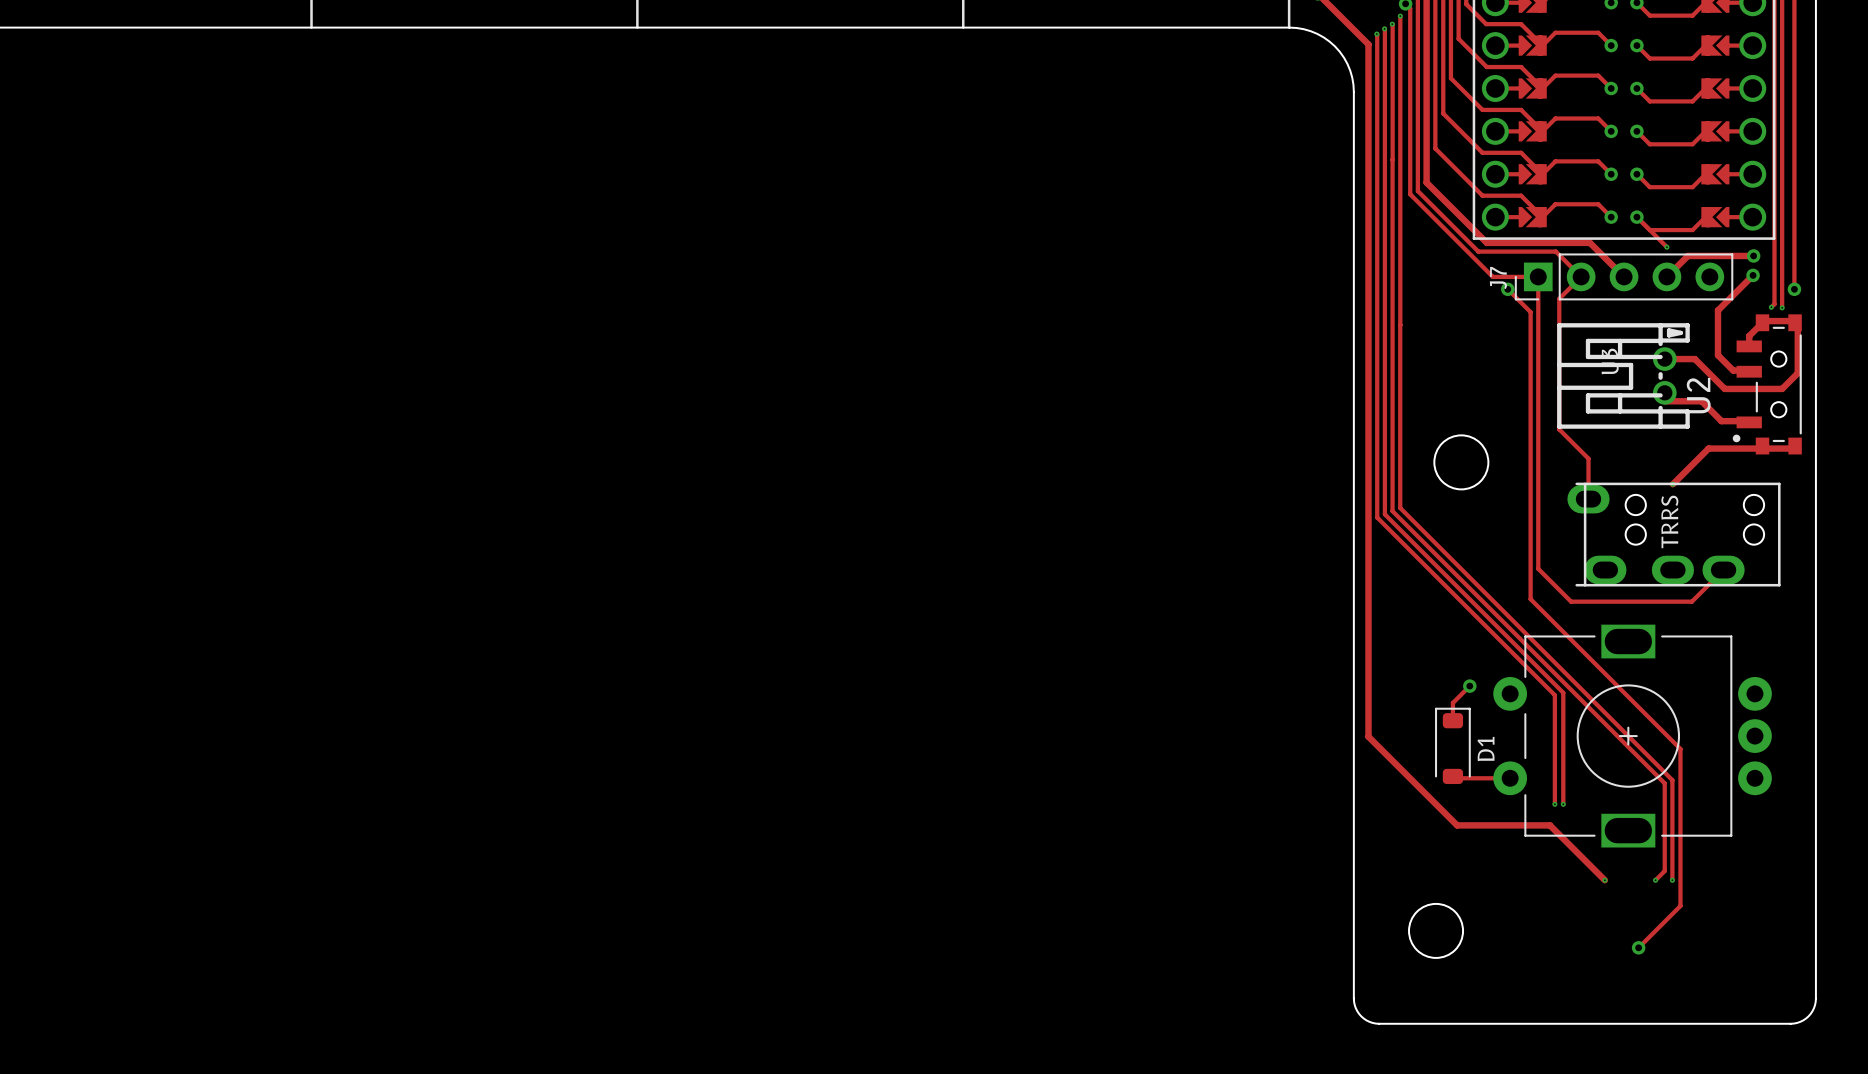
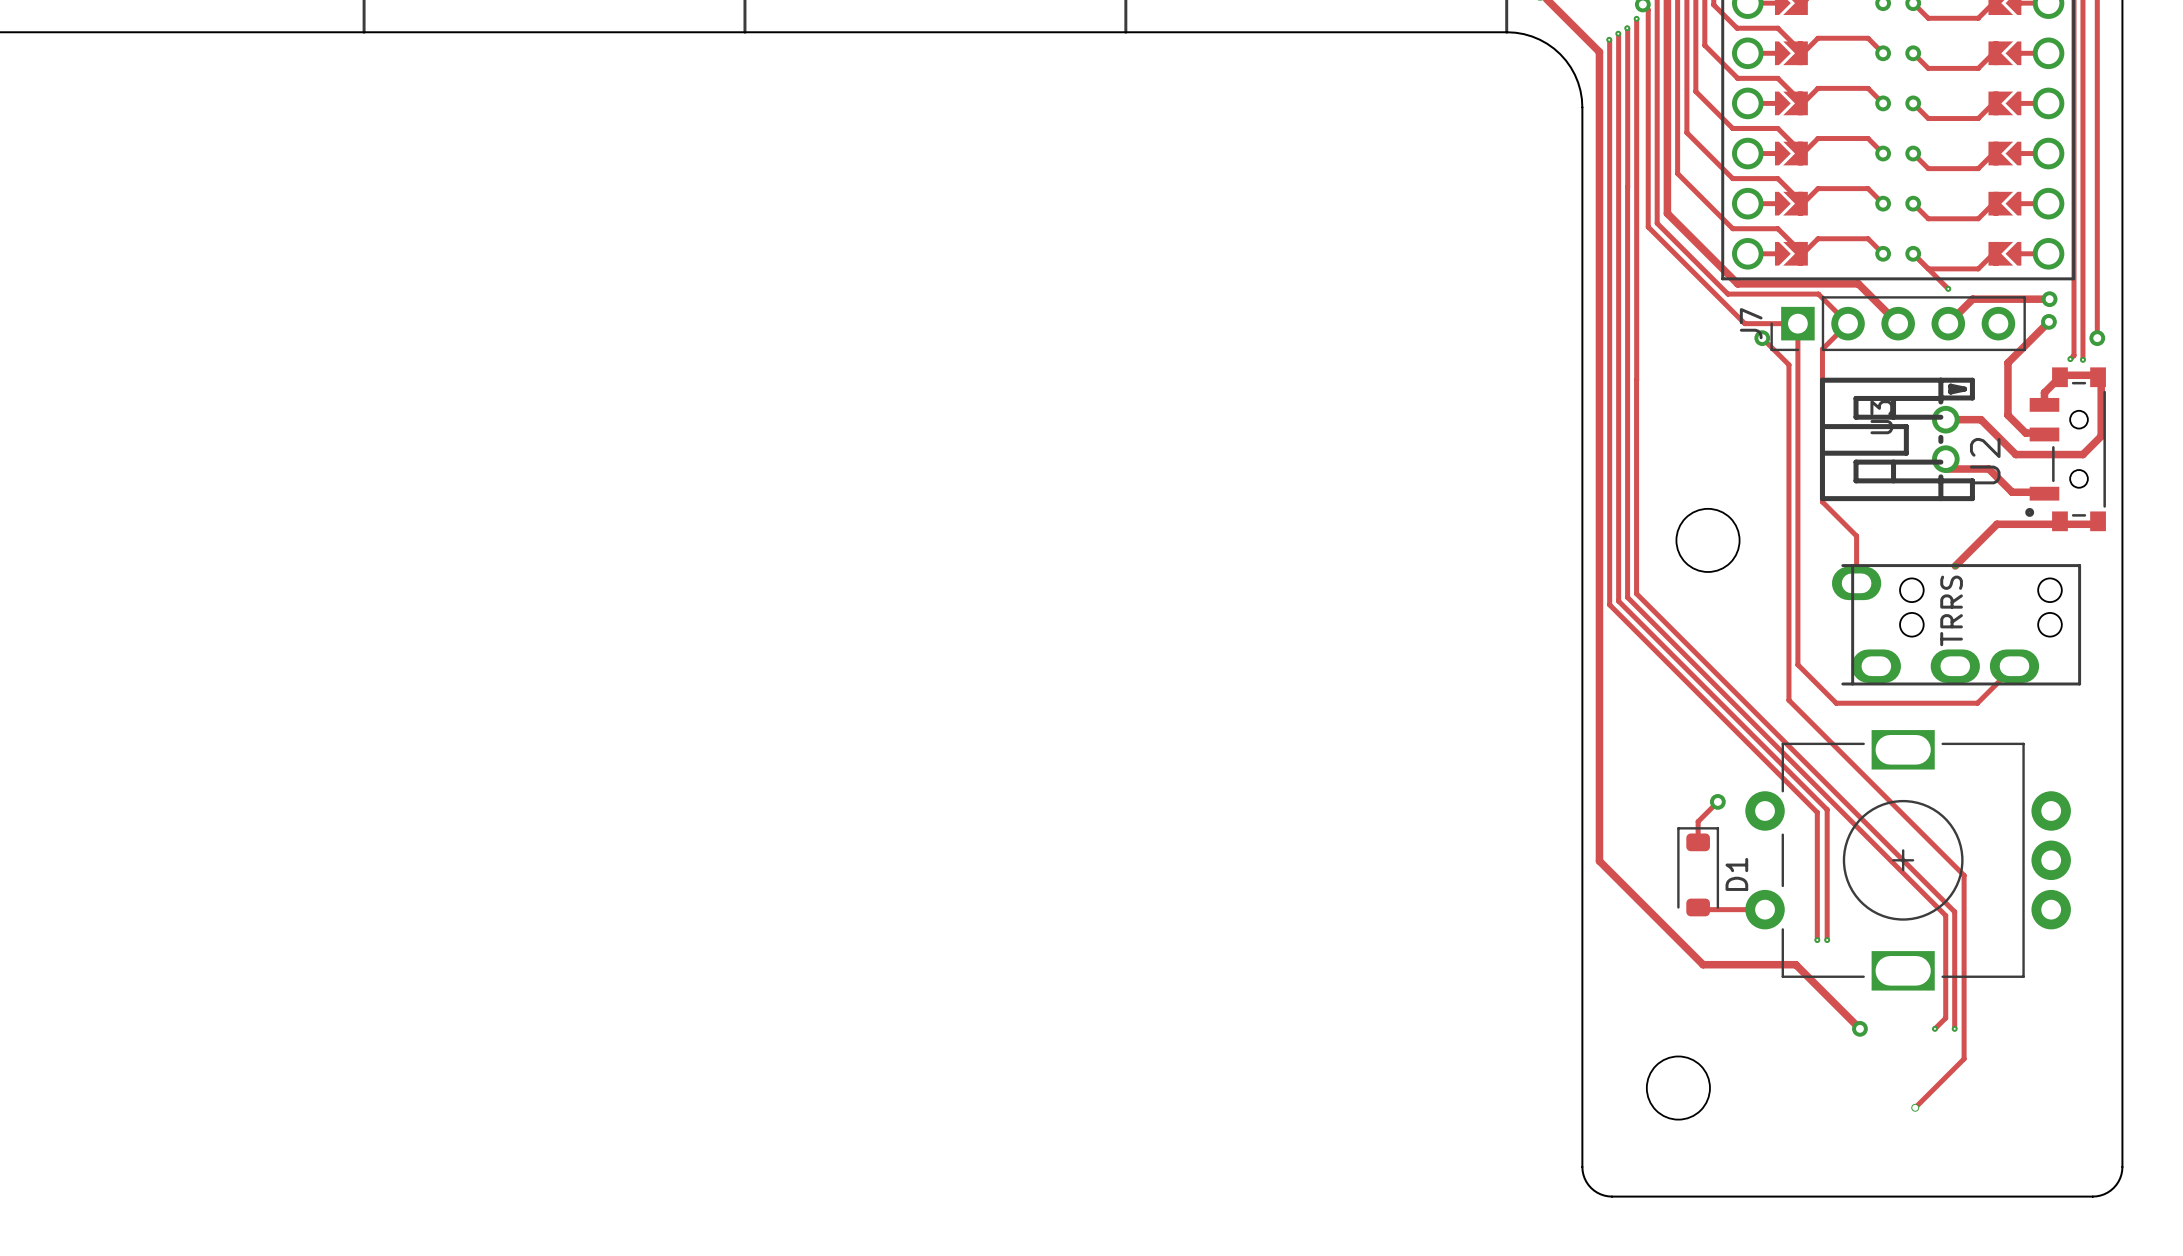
track: (1536, 825) (1550, 825) (1604, 880) -> (1795, 964) (1859, 1028)
via: (1604, 880) -> none
via position: (1638, 947) -> (1859, 1028)
via: none -> (1915, 1107)

